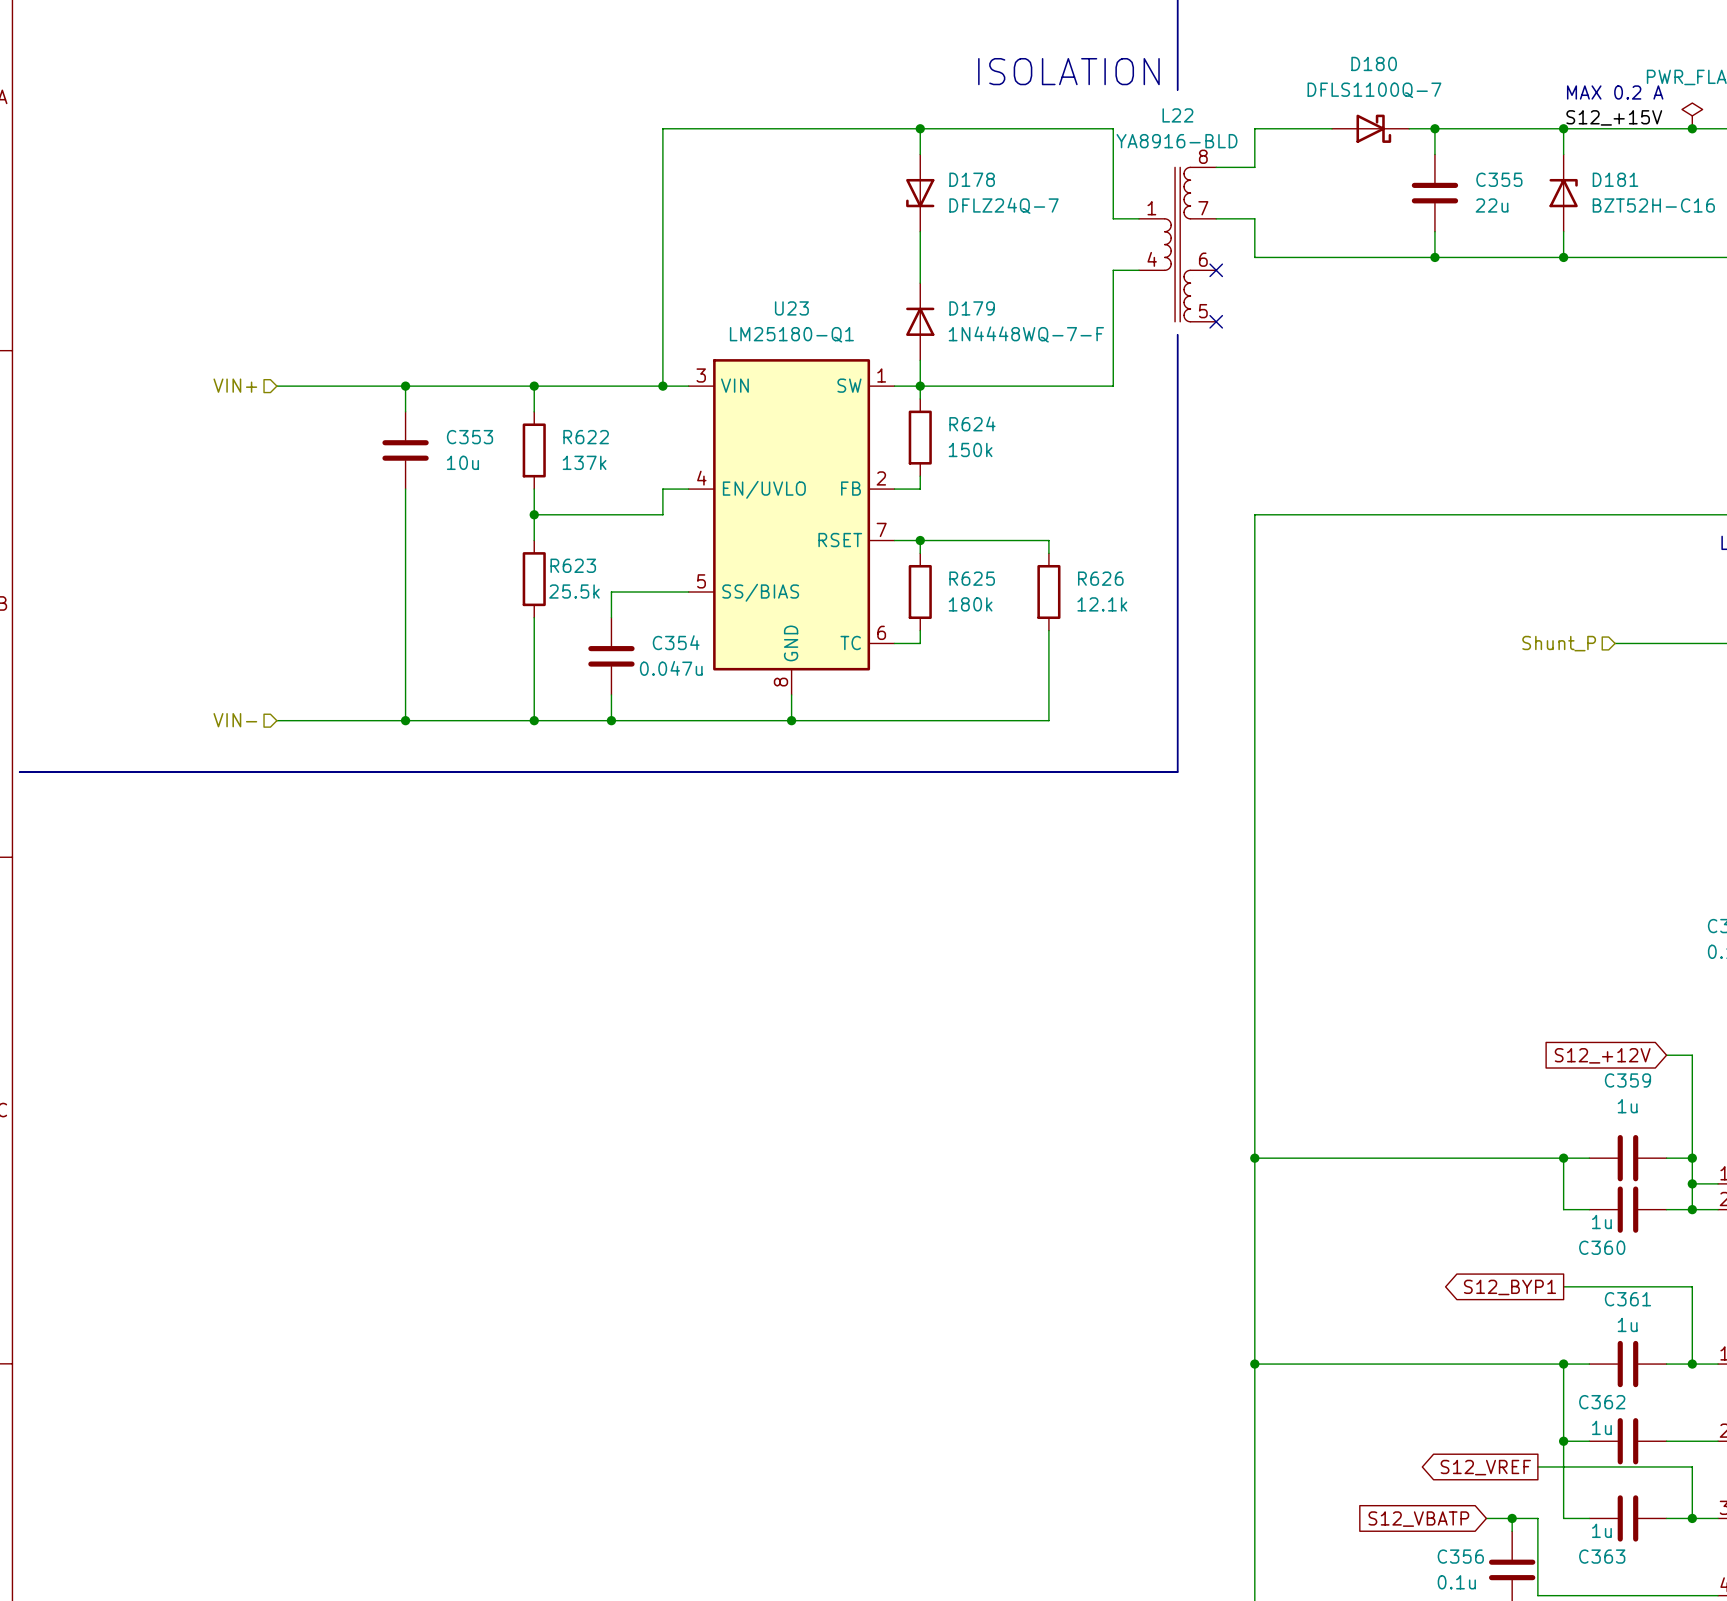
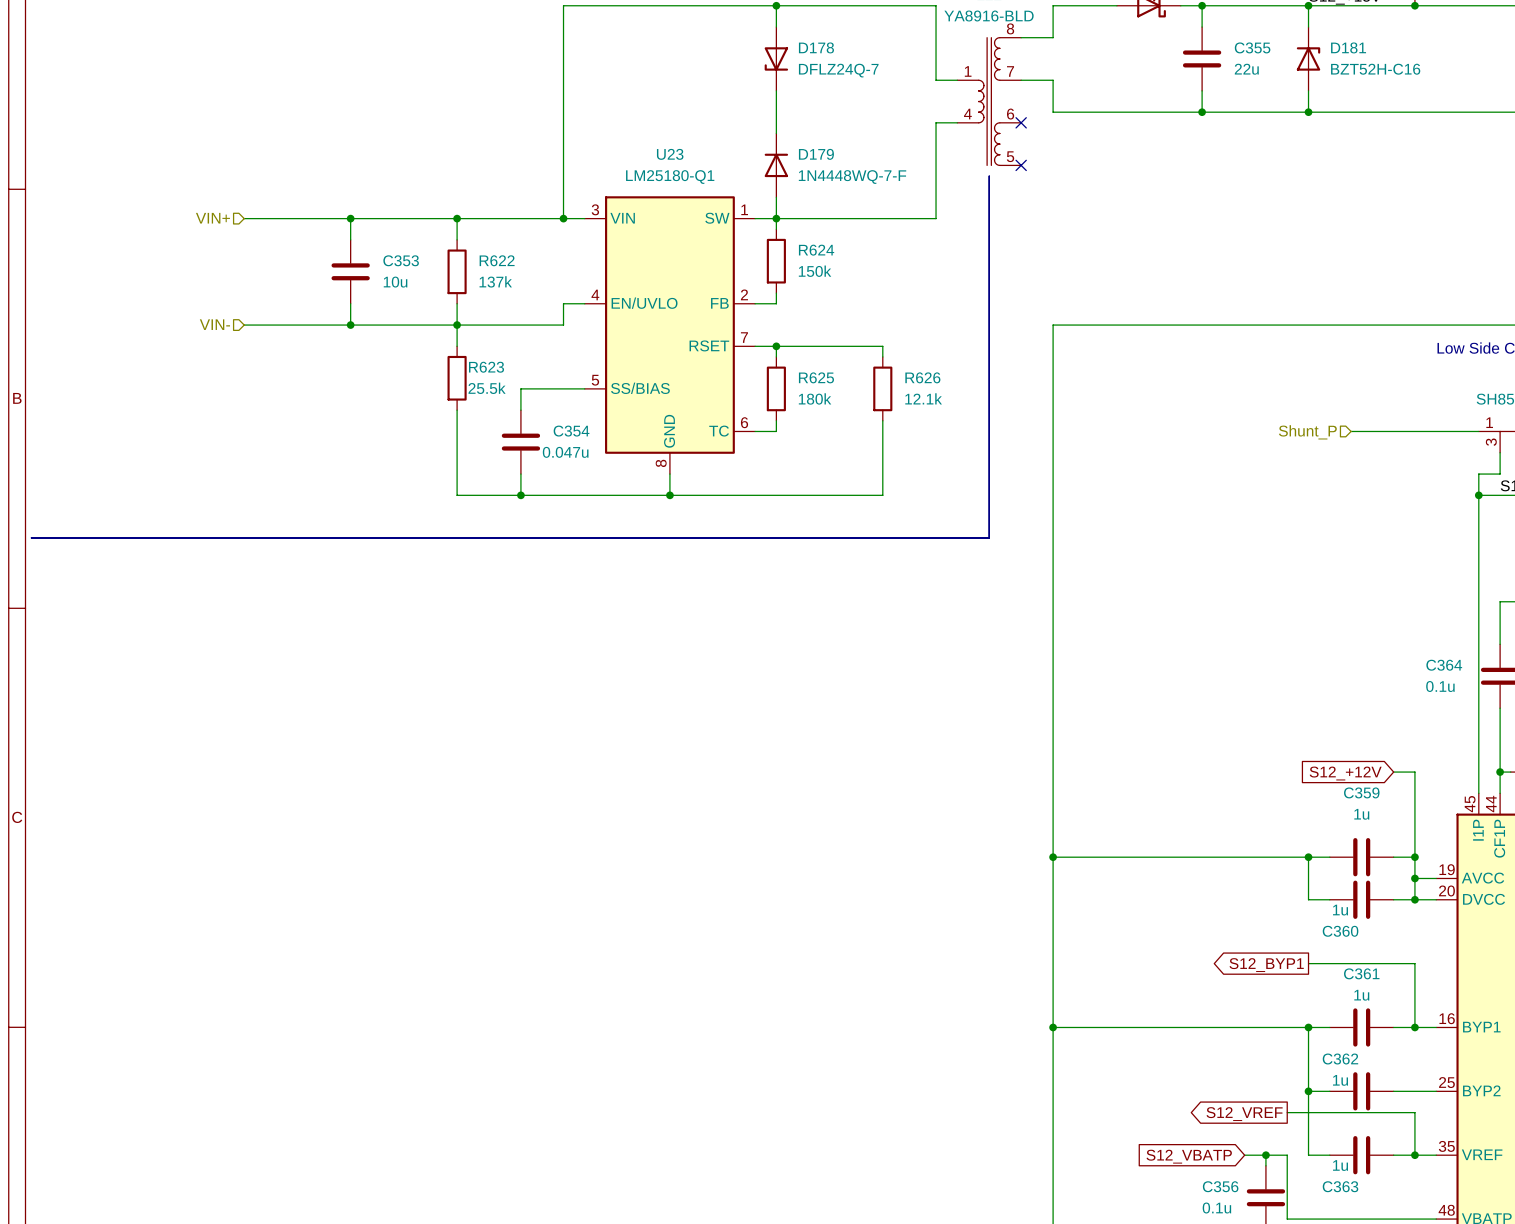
wire: (405, 514) (405, 720) -> none
junction: none -> (350, 325)
hierarchical label position: VIN- (235, 720) -> VIN- (214, 324)
wire: (276, 720) (534, 720) -> (244, 325) (457, 325)
junction: (405, 720) -> none
junction: (534, 720) -> none

